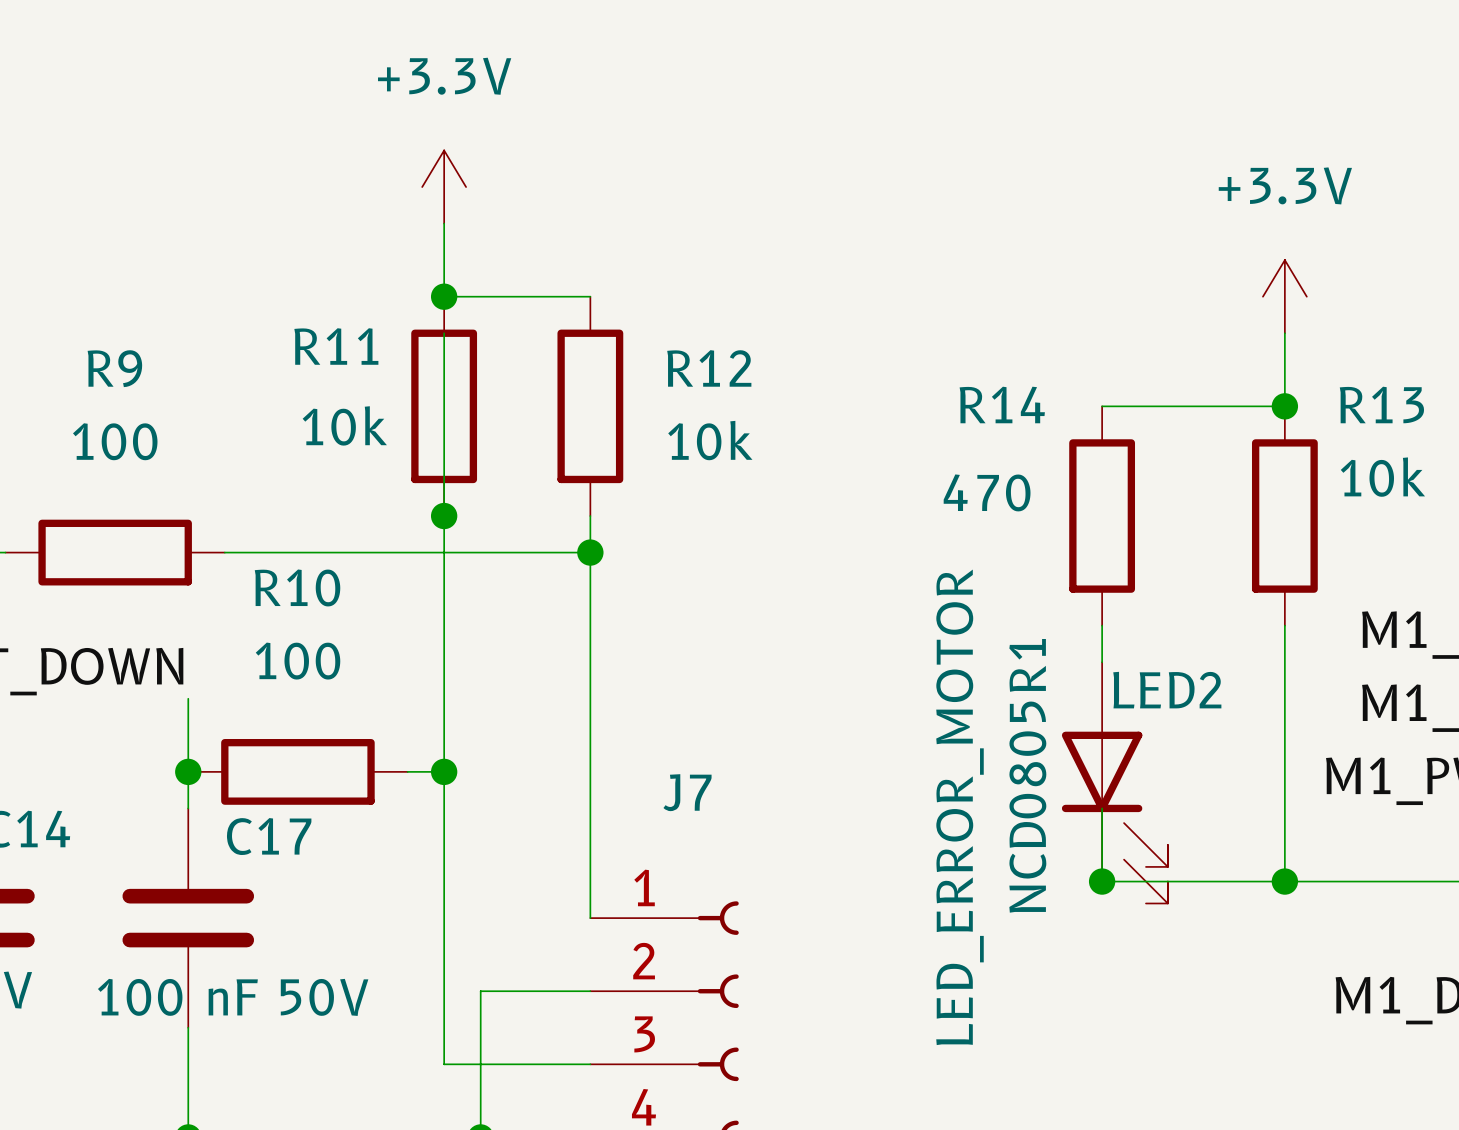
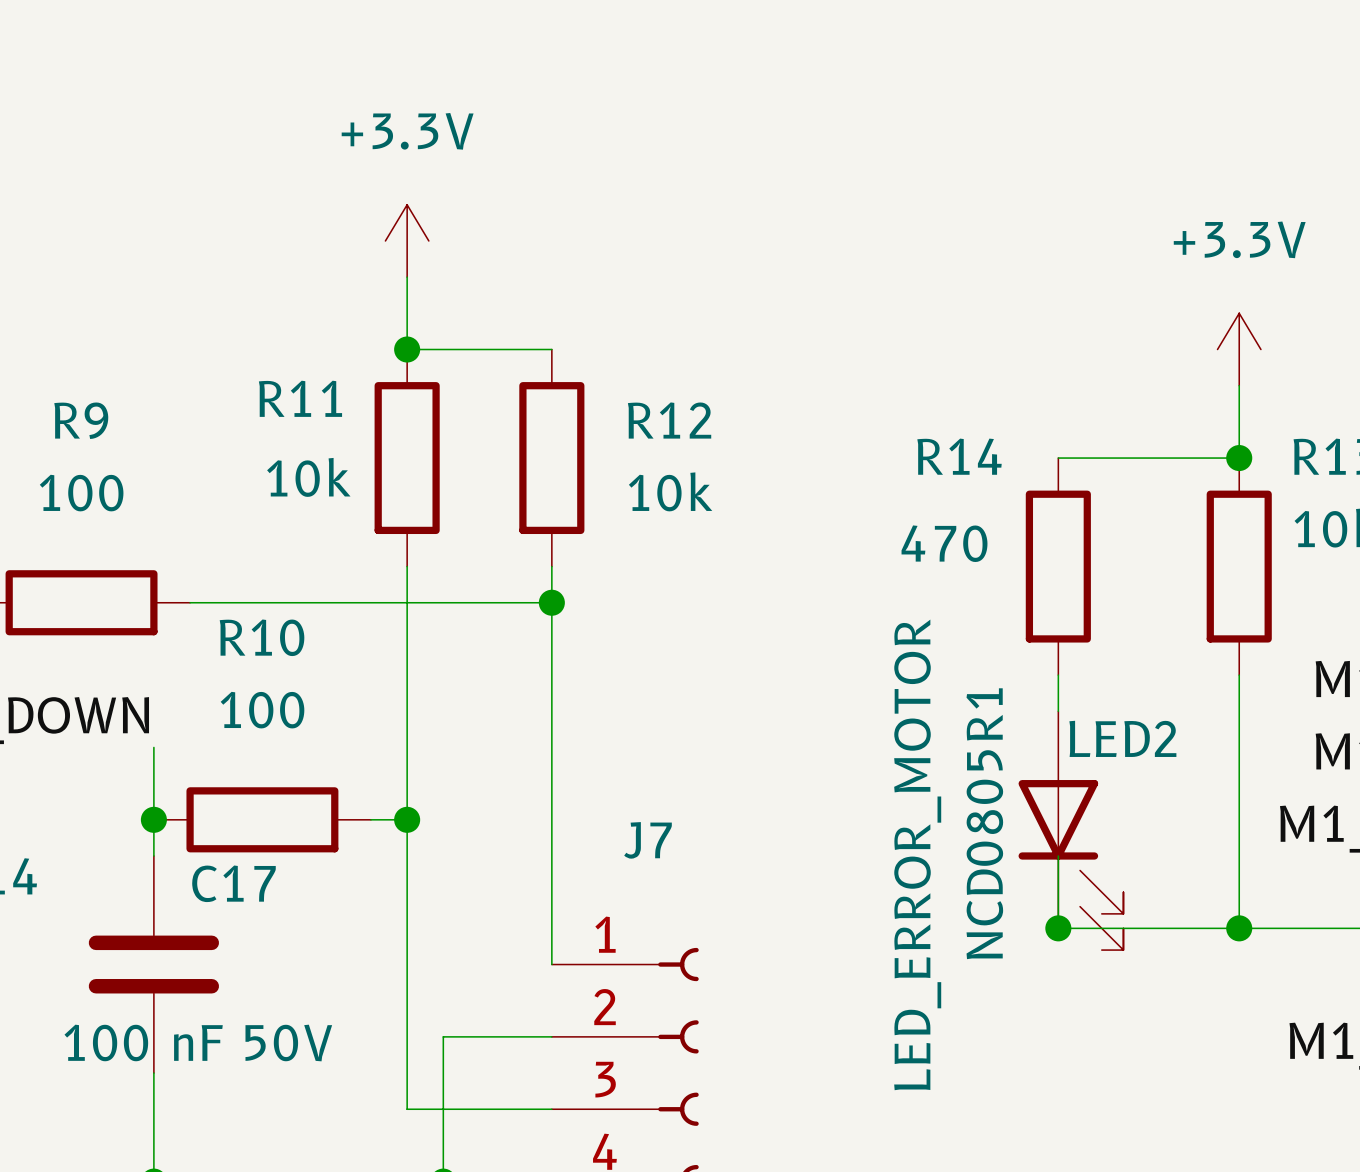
wire: (444, 333) (444, 516) -> none
junction: (444, 516) -> none

